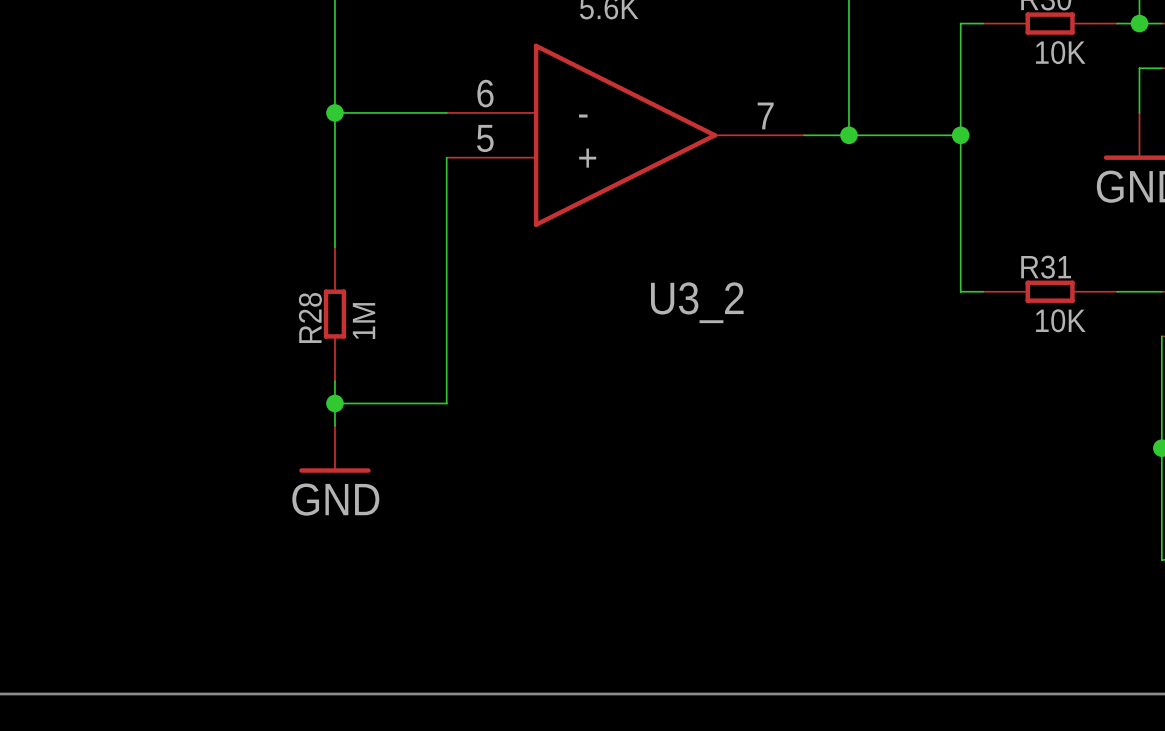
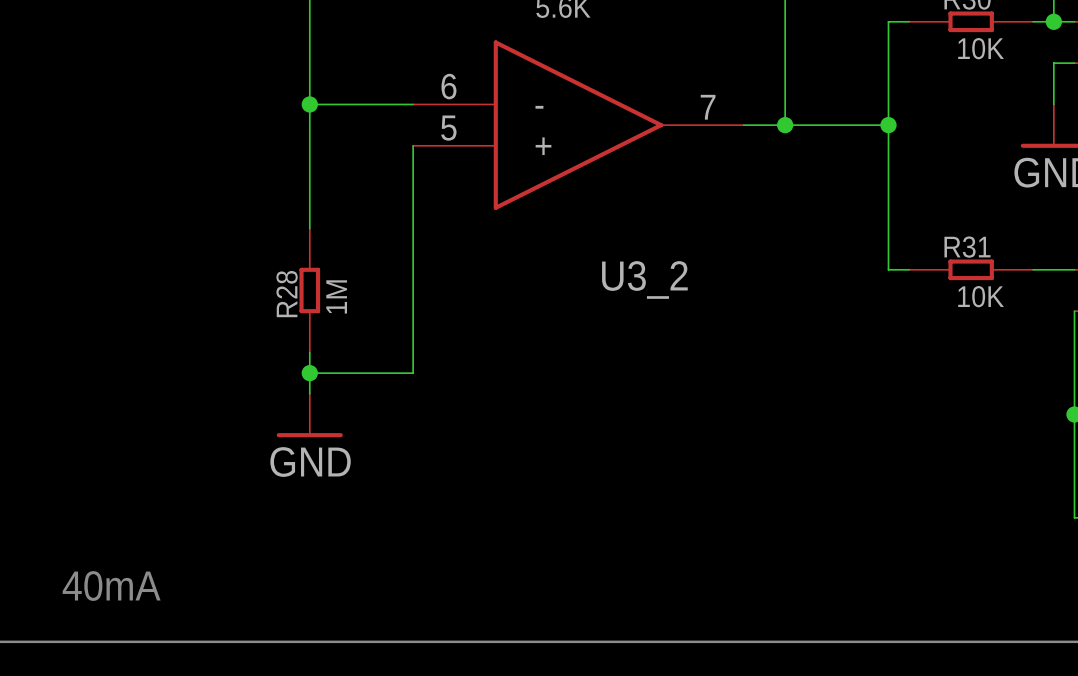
text: none -> 40mA (111, 586)

